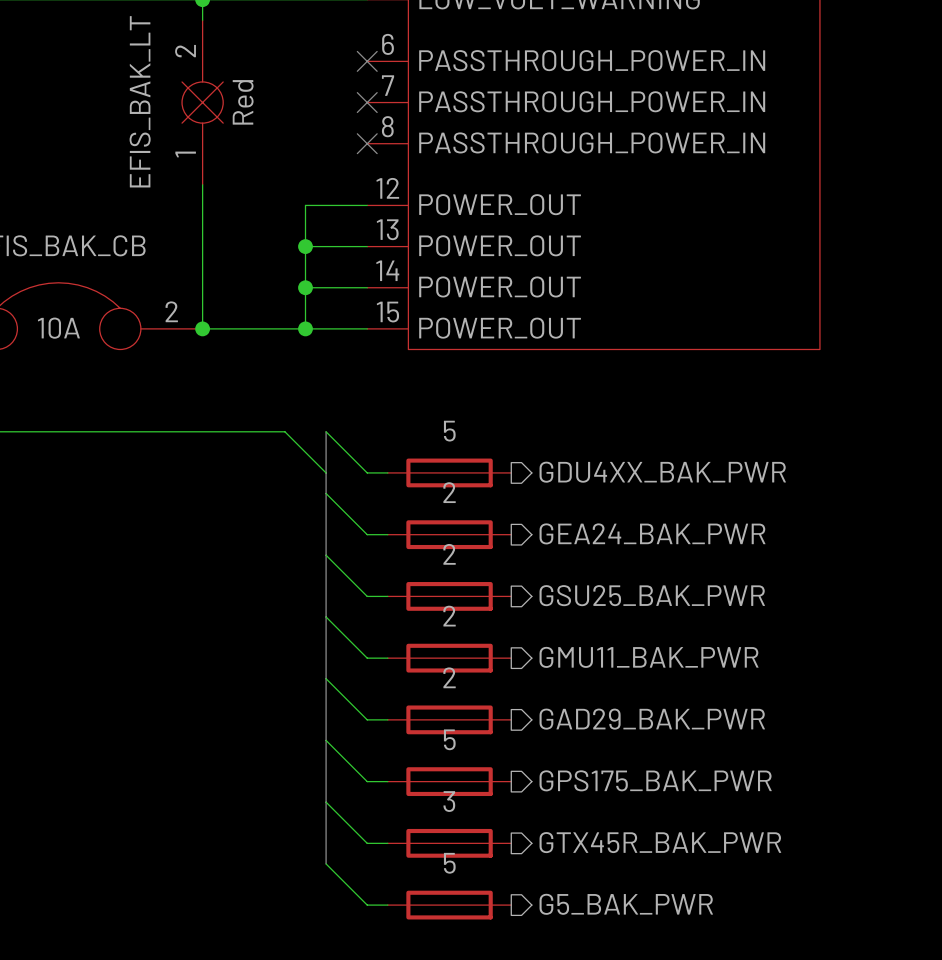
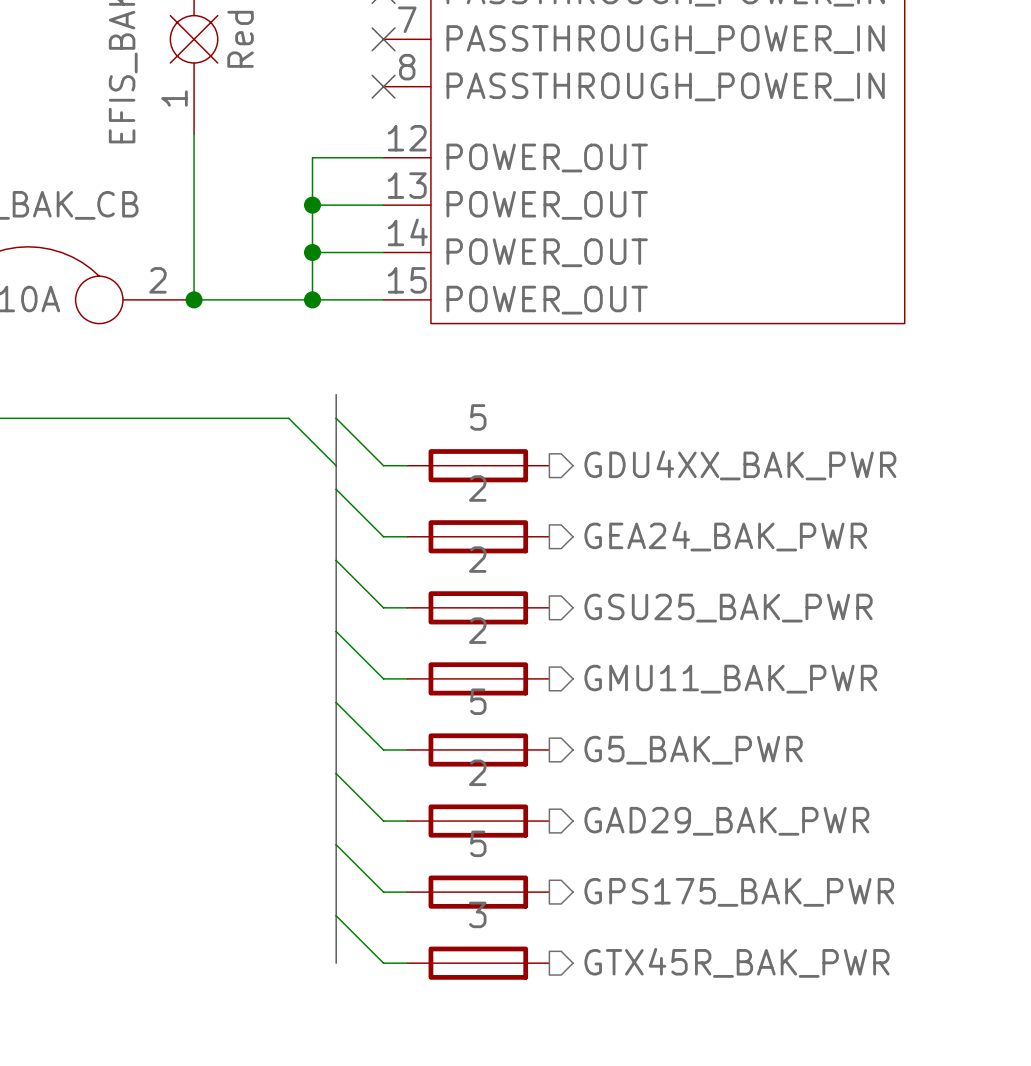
bus: none -> (336, 394) (336, 418)
part value: 2 (449, 677) -> 5 (478, 701)
hierarchical label: GAD29_BAK_PWR (652, 719) -> G5_BAK_PWR (693, 750)
part value: 5 (449, 739) -> 2 (477, 772)
hierarchical label: GPS175_BAK_PWR (655, 780) -> GAD29_BAK_PWR (726, 821)
part value: 3 (449, 801) -> 5 (478, 843)
hierarchical label: GTX45R_BAK_PWR (660, 842) -> GPS175_BAK_PWR (739, 892)
bus: none -> (336, 915) (336, 963)
part value: 5 (449, 863) -> 3 (477, 914)
hierarchical label: G5_BAK_PWR (626, 904) -> GTX45R_BAK_PWR (737, 962)

